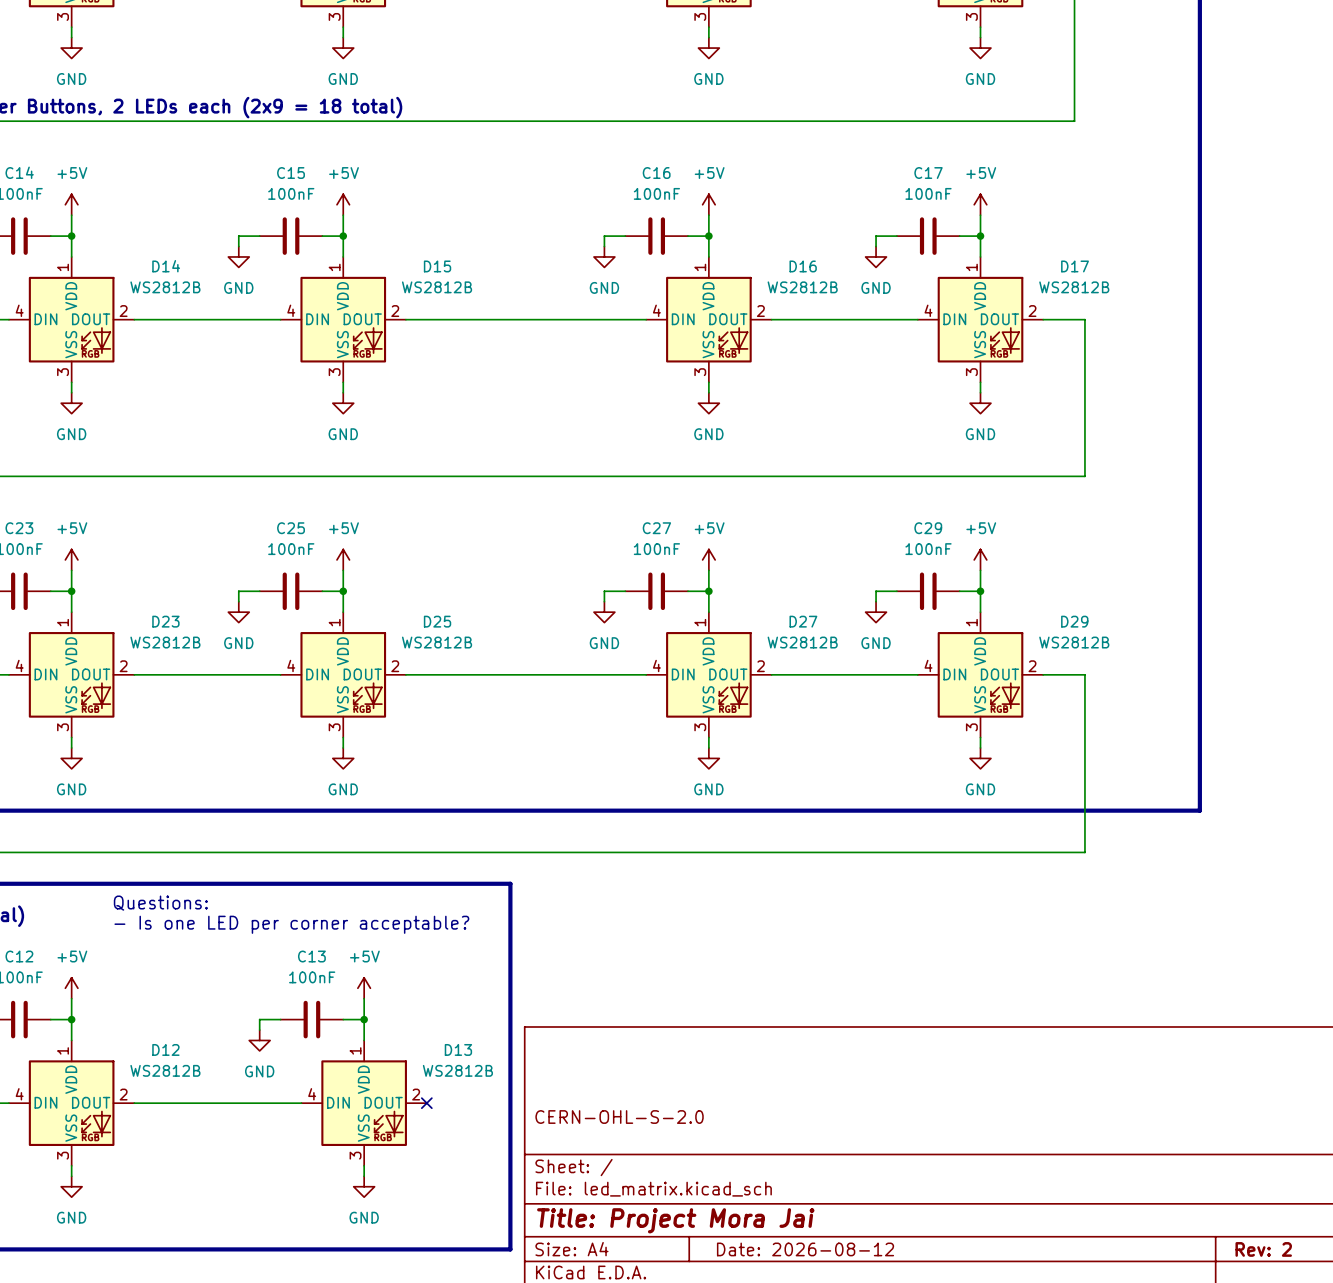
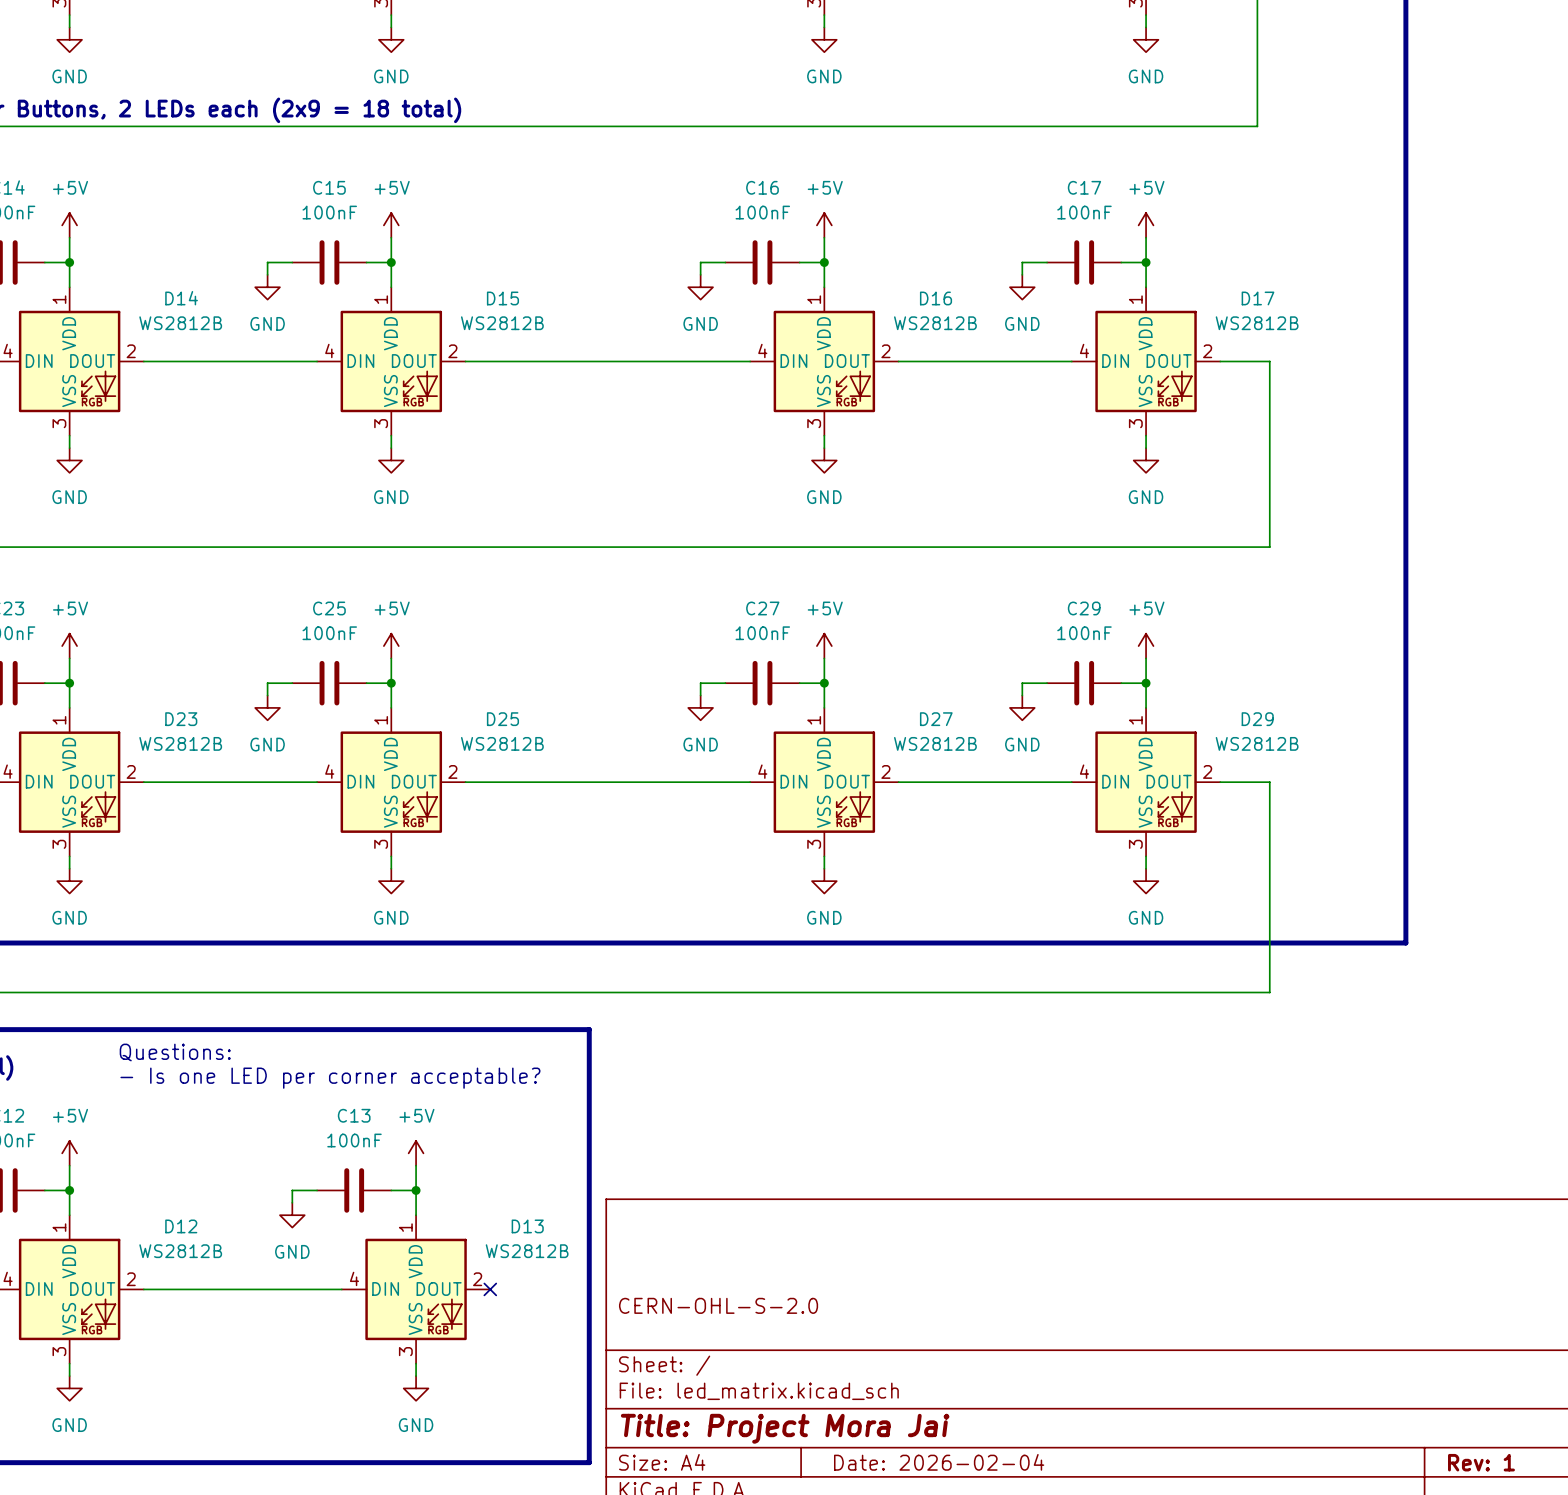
title block: Date: 2026-08-12 (805, 1249) -> Date: 2026-02-04 (939, 1462)
title block: Rev: 2 (1263, 1249) -> Rev: 1 (1481, 1462)

